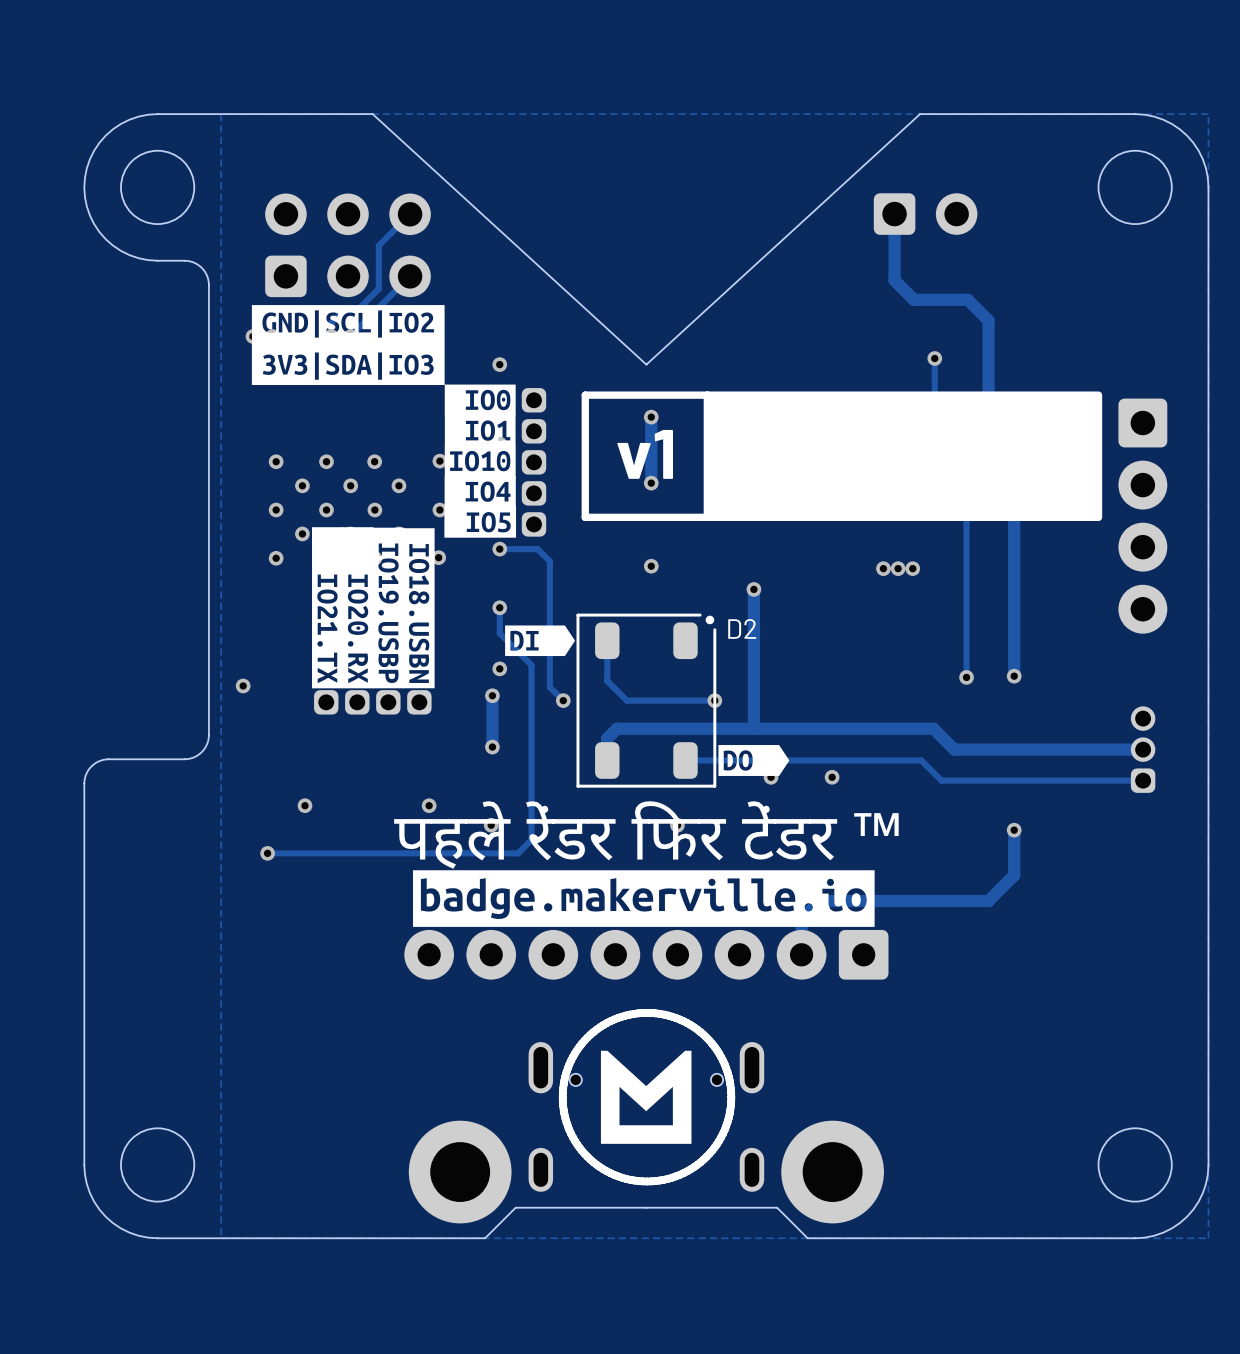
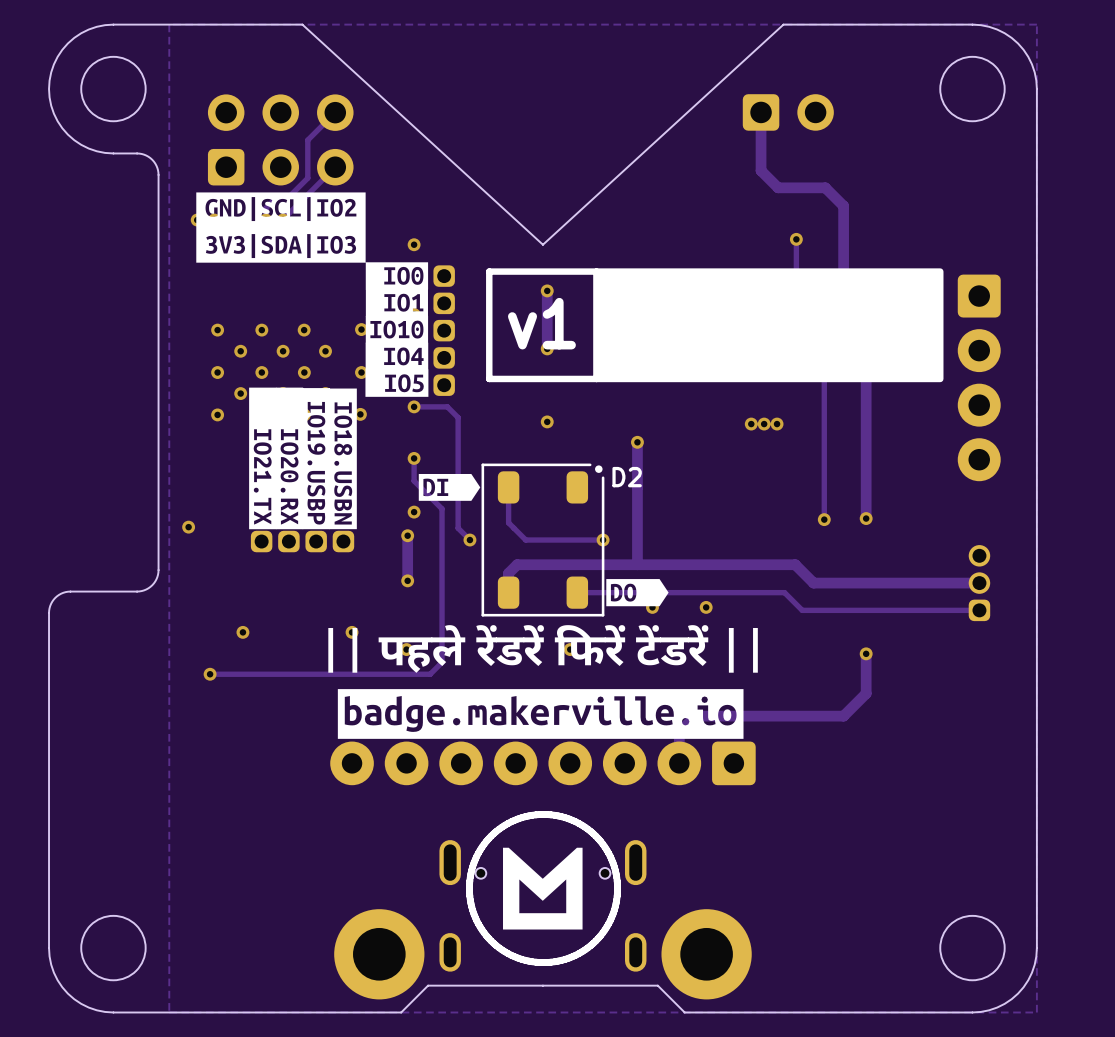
drawing: none -> [328, 625, 758, 673]
drawing: [394, 801, 899, 869] -> none

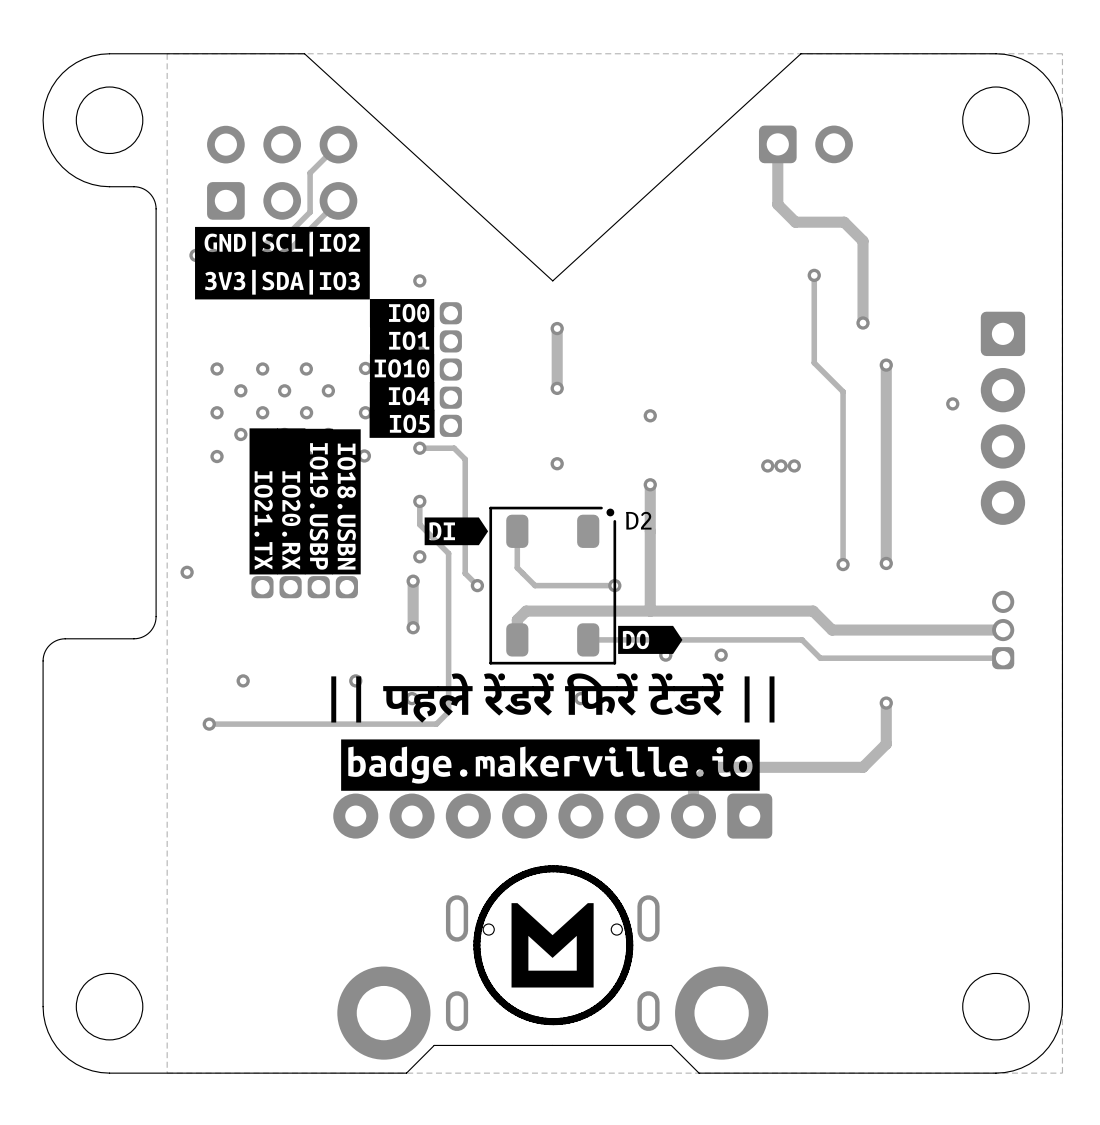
drawing: [593, 268, 944, 383] -> none
line: (596, 271) (489, 271) (489, 378) (596, 378) (596, 271) -> none
text: v1 (541, 323) -> none

